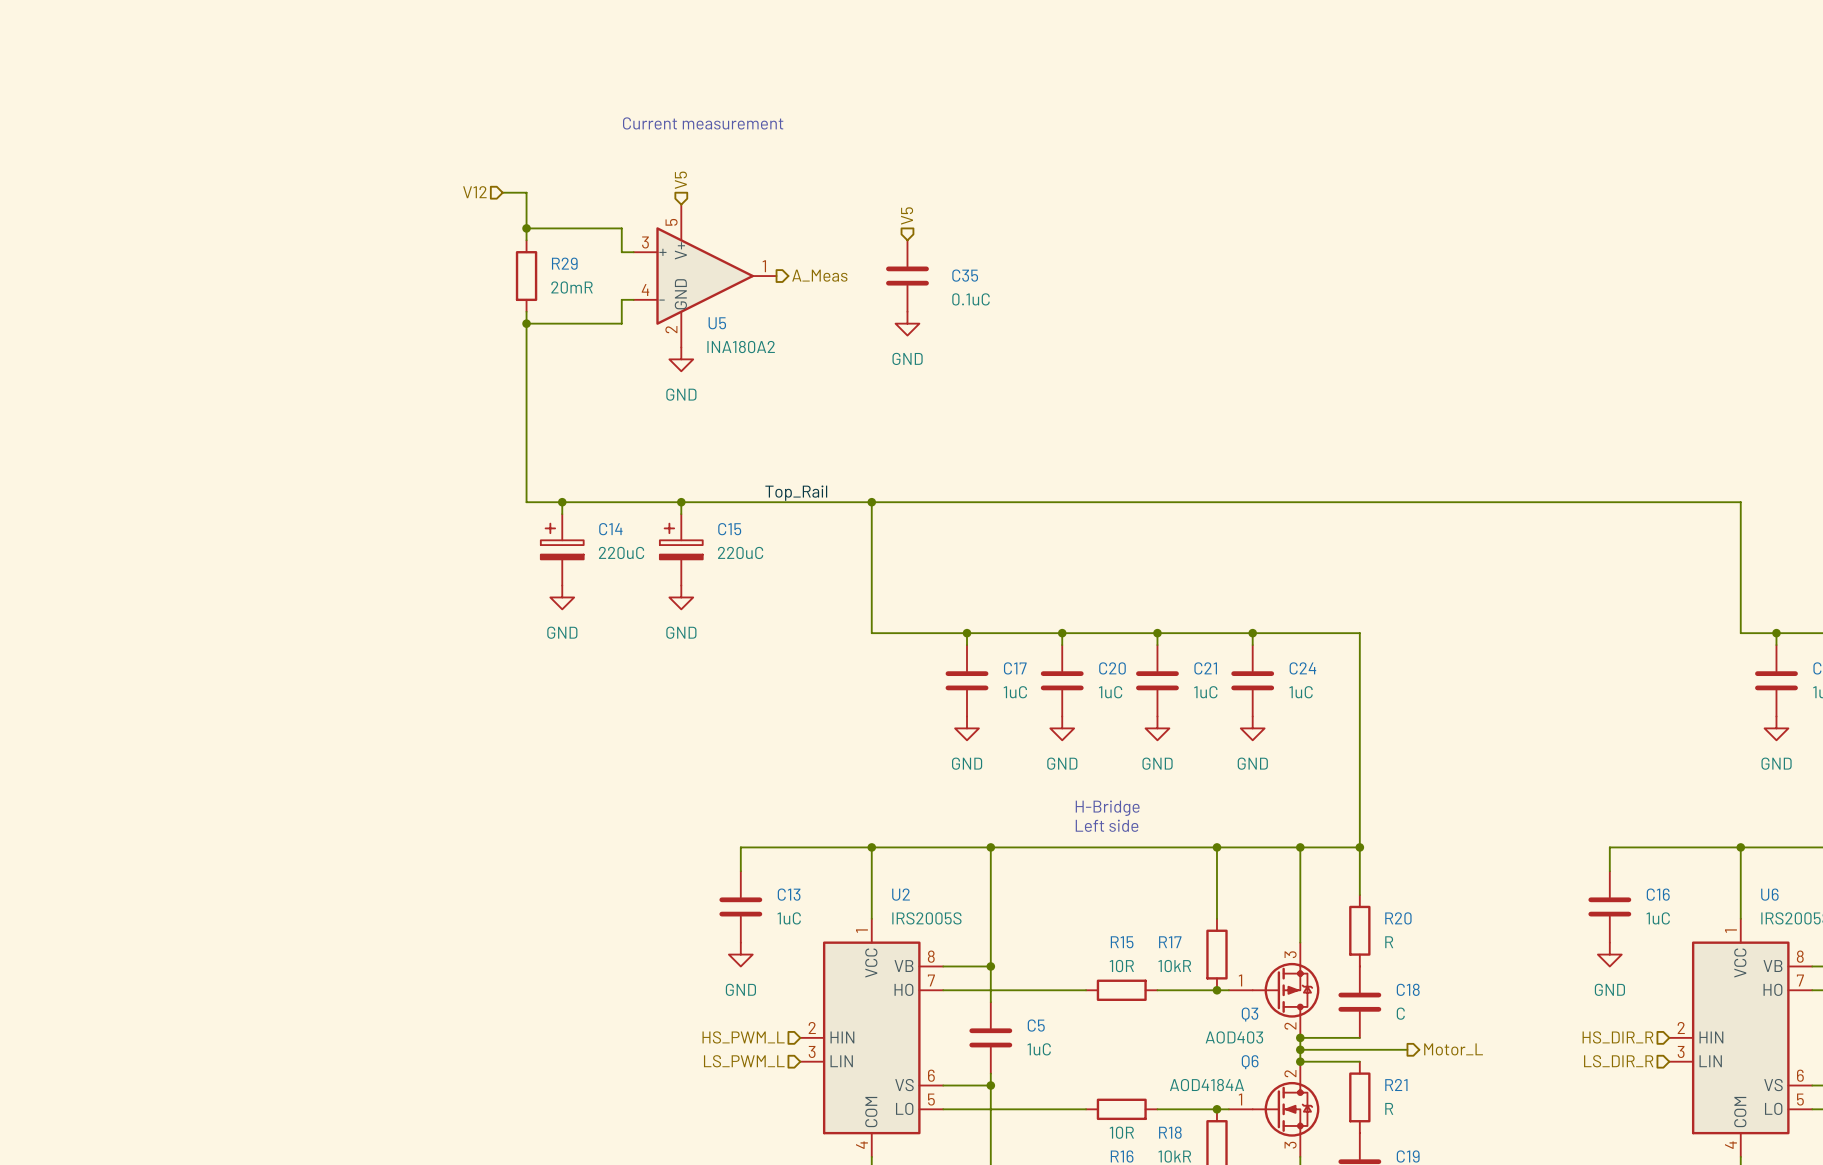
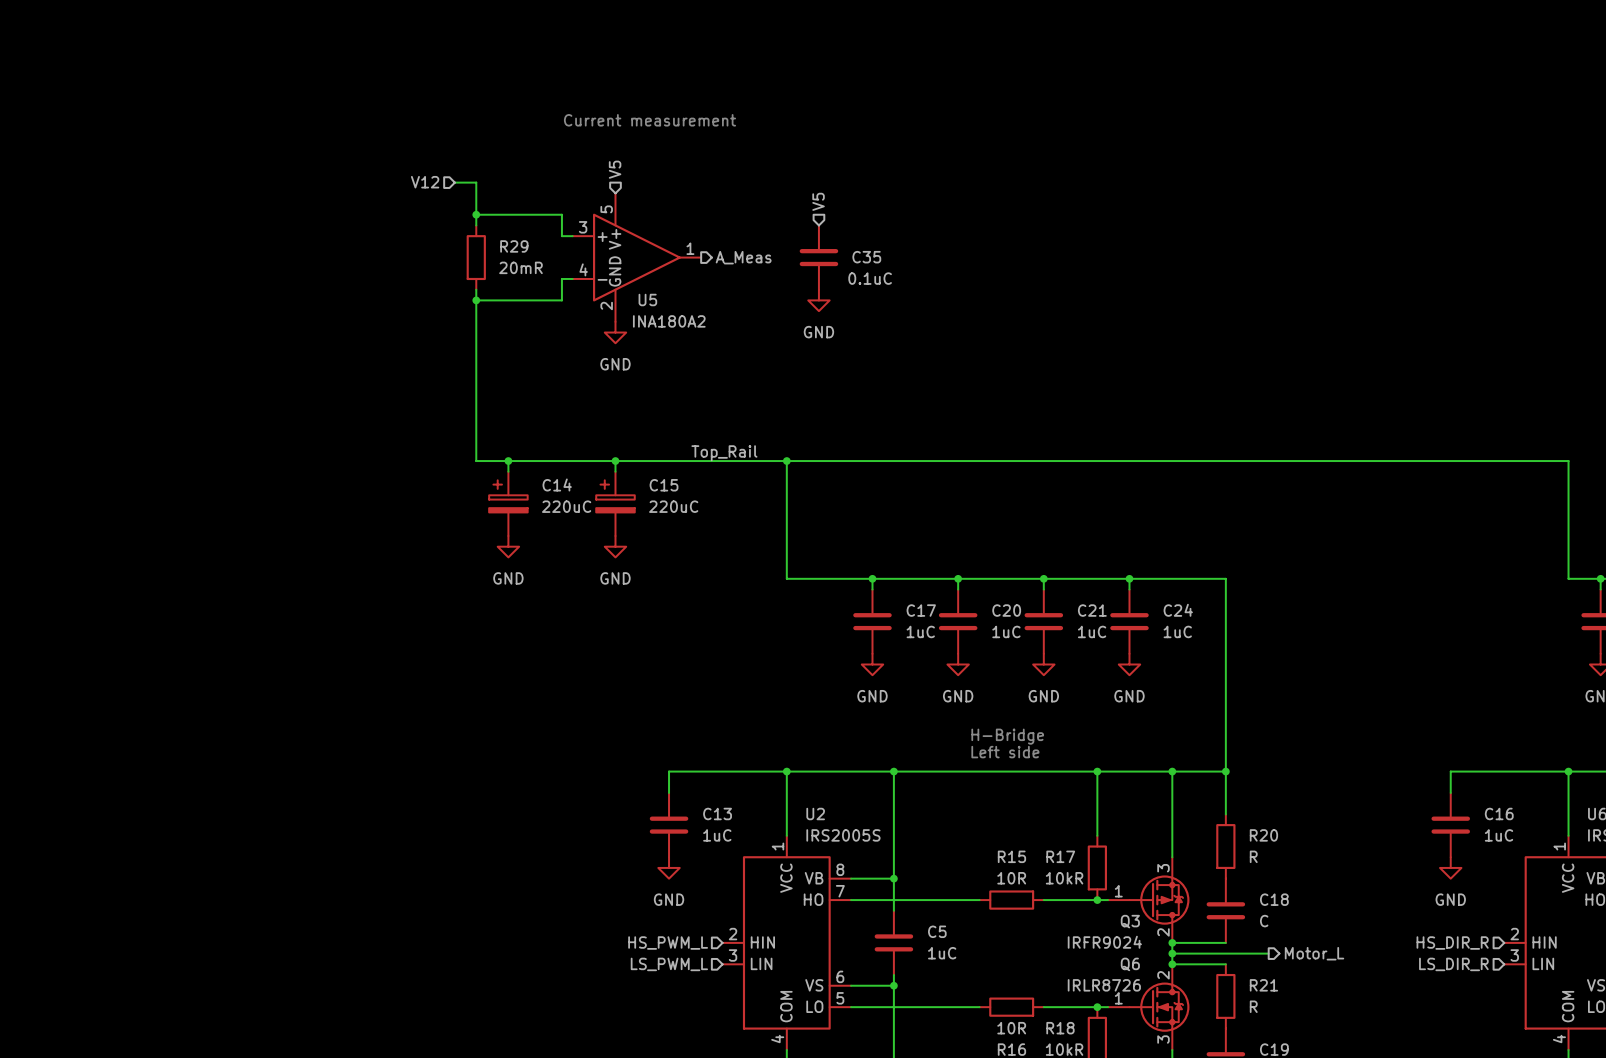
Q3 value: AOD403 (1234, 1037) -> IRFR9024 (1104, 942)
Q6 value: AOD4184A (1206, 1085) -> IRLR8726 (1104, 985)

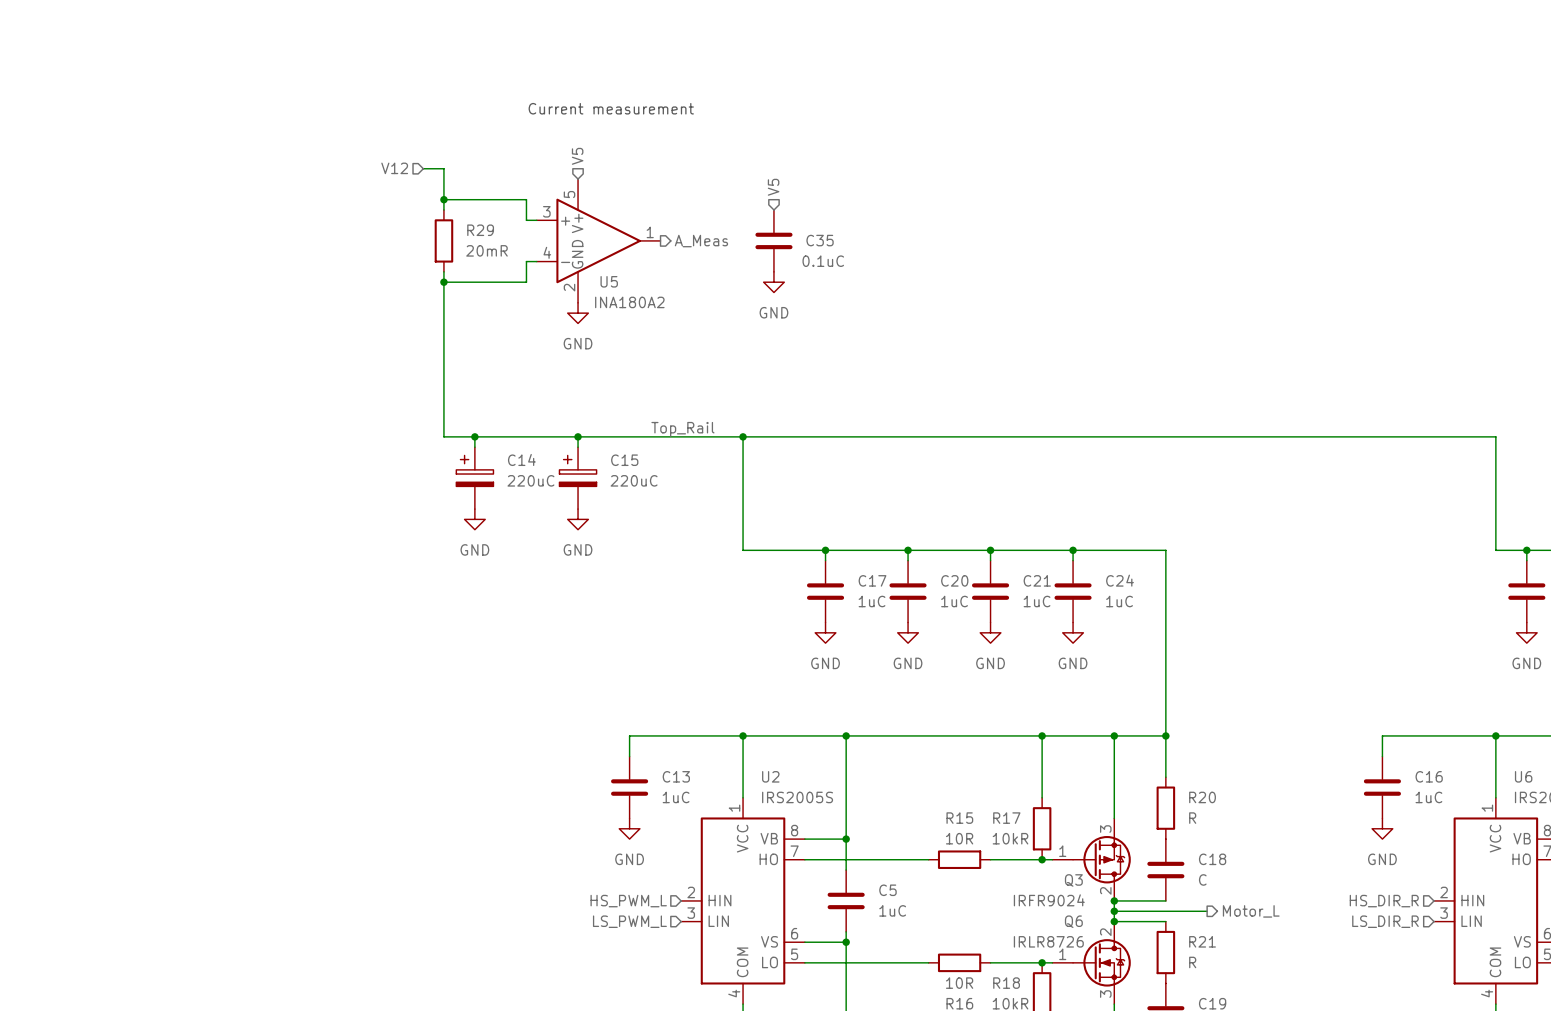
text: H-Bridge (1007, 736) -> none
text: Left side (1005, 752) -> none

